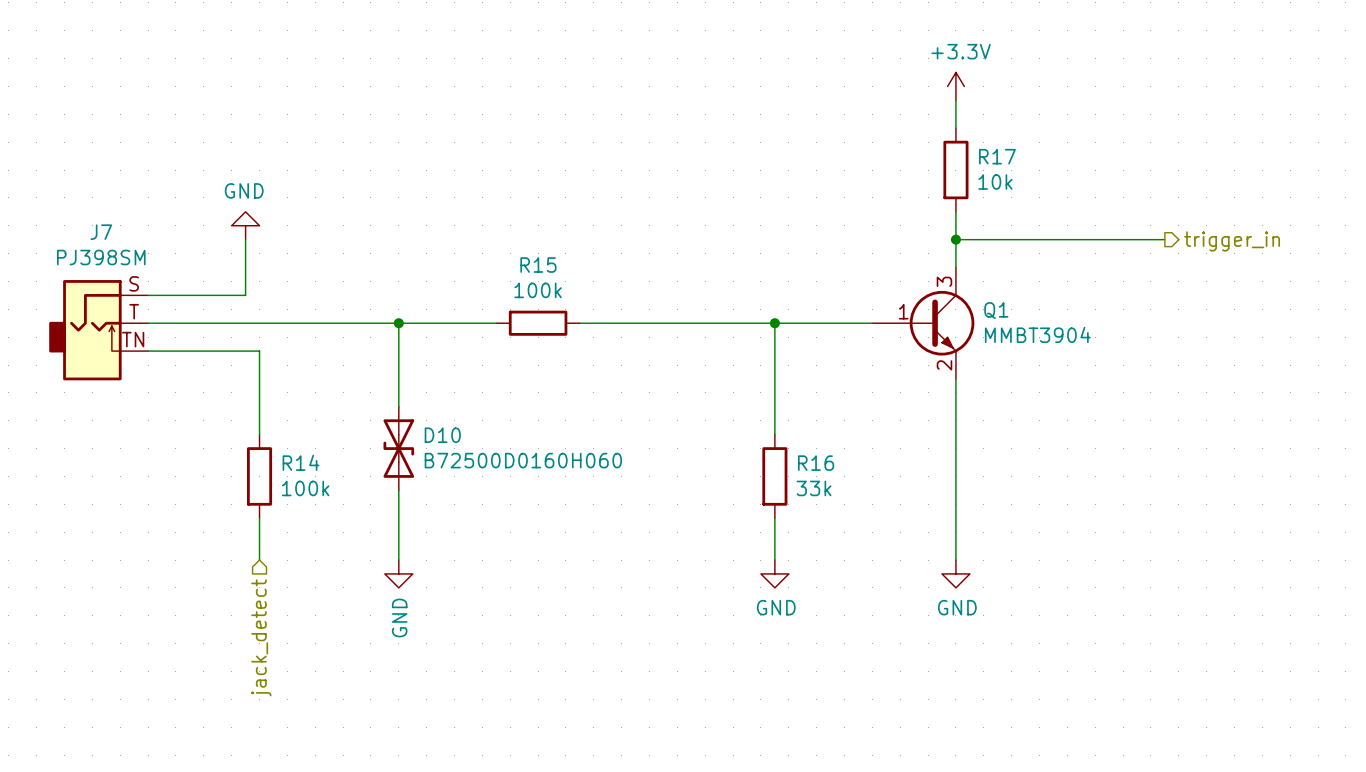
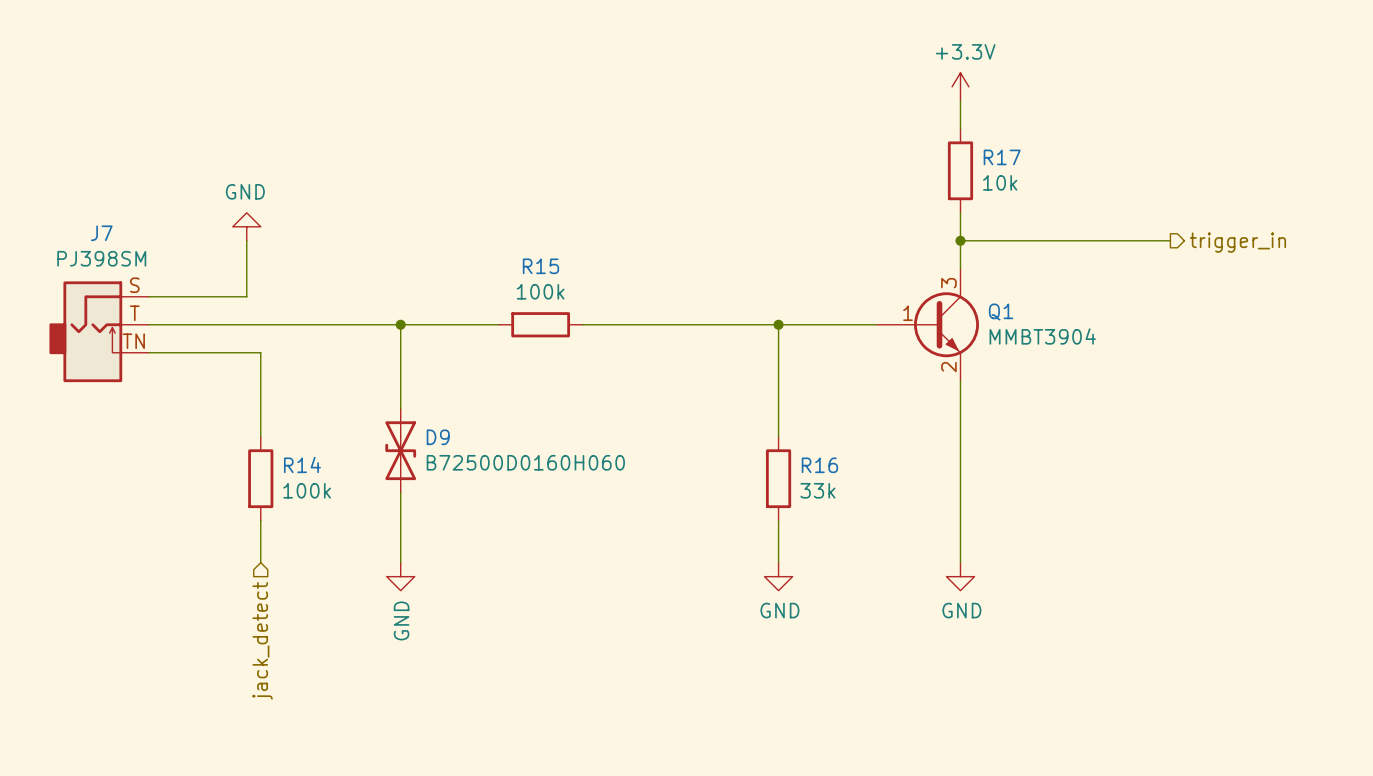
D10 name: D10 (442, 435) -> D9 (438, 437)

